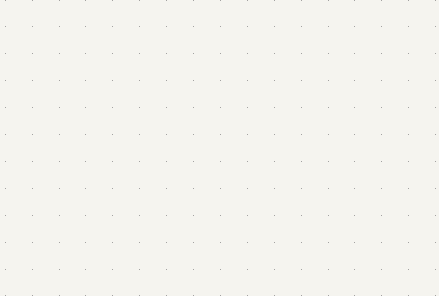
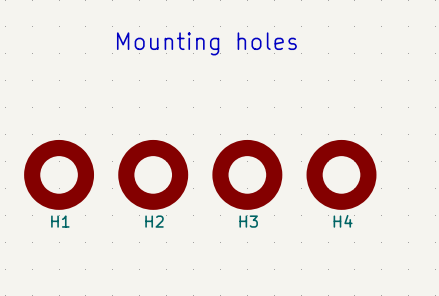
text: none -> Mounting holes (206, 43)
H1: none -> (59, 174)
H2: none -> (153, 174)
H3: none -> (247, 174)
H4: none -> (341, 174)

